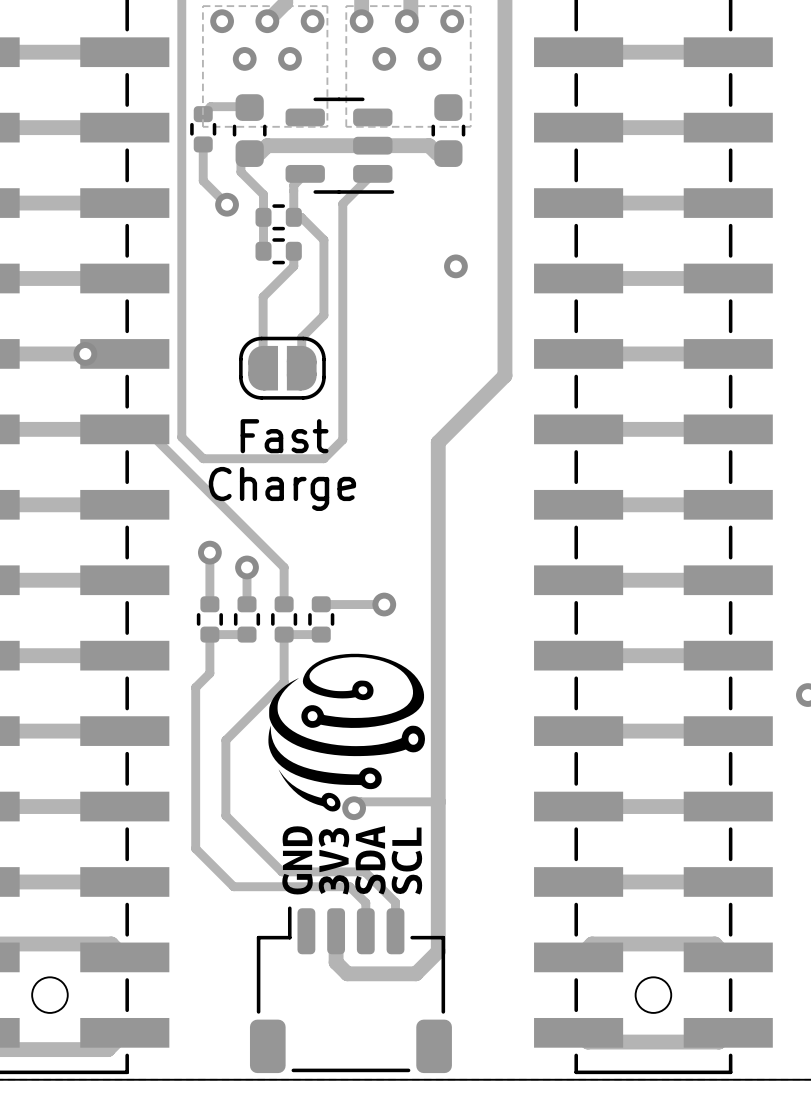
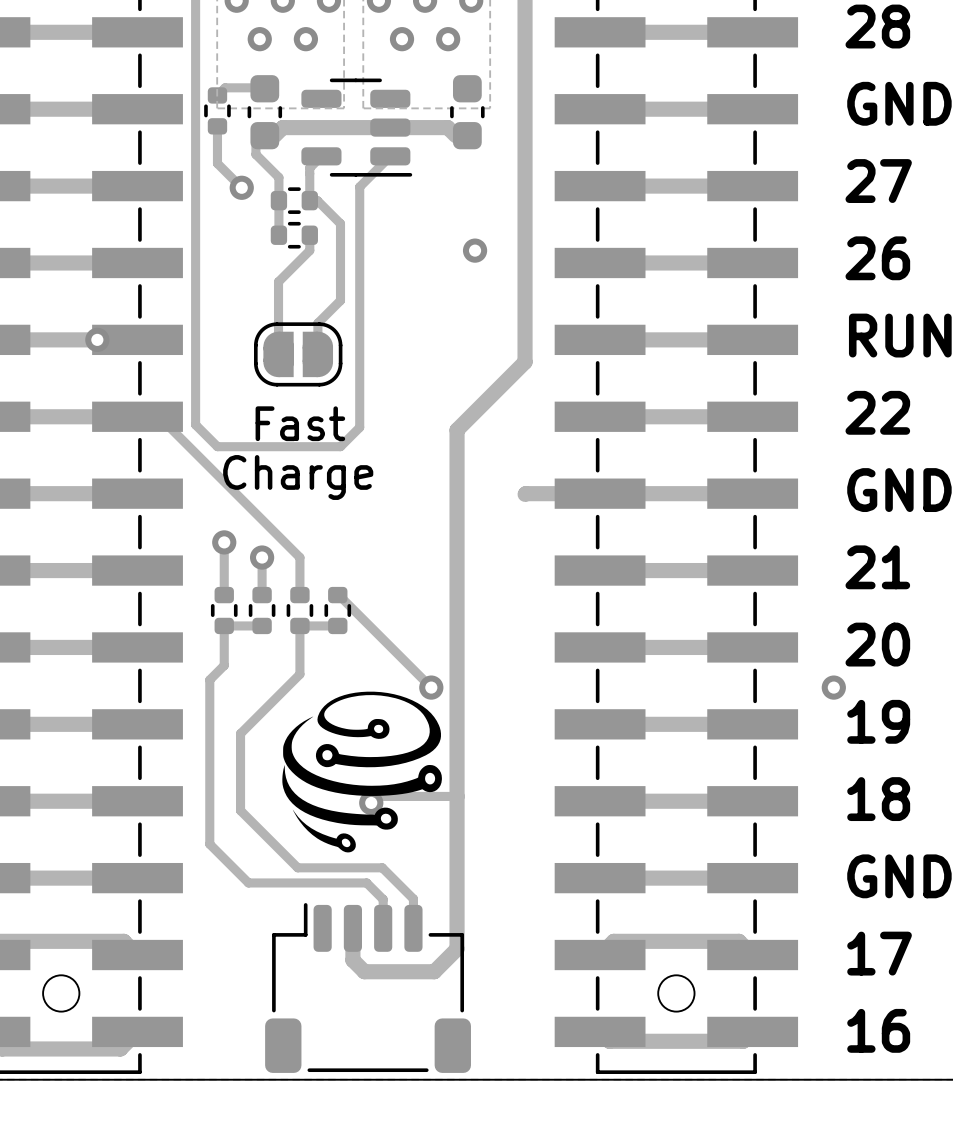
track: none -> (600, 493) (525, 494)
track: (322, 604) (384, 604) -> (339, 595) (431, 687)
via position: (384, 604) -> (431, 687)
drawing position: (346, 732) -> (362, 772)
drawing: [282, 826, 423, 895] -> none

